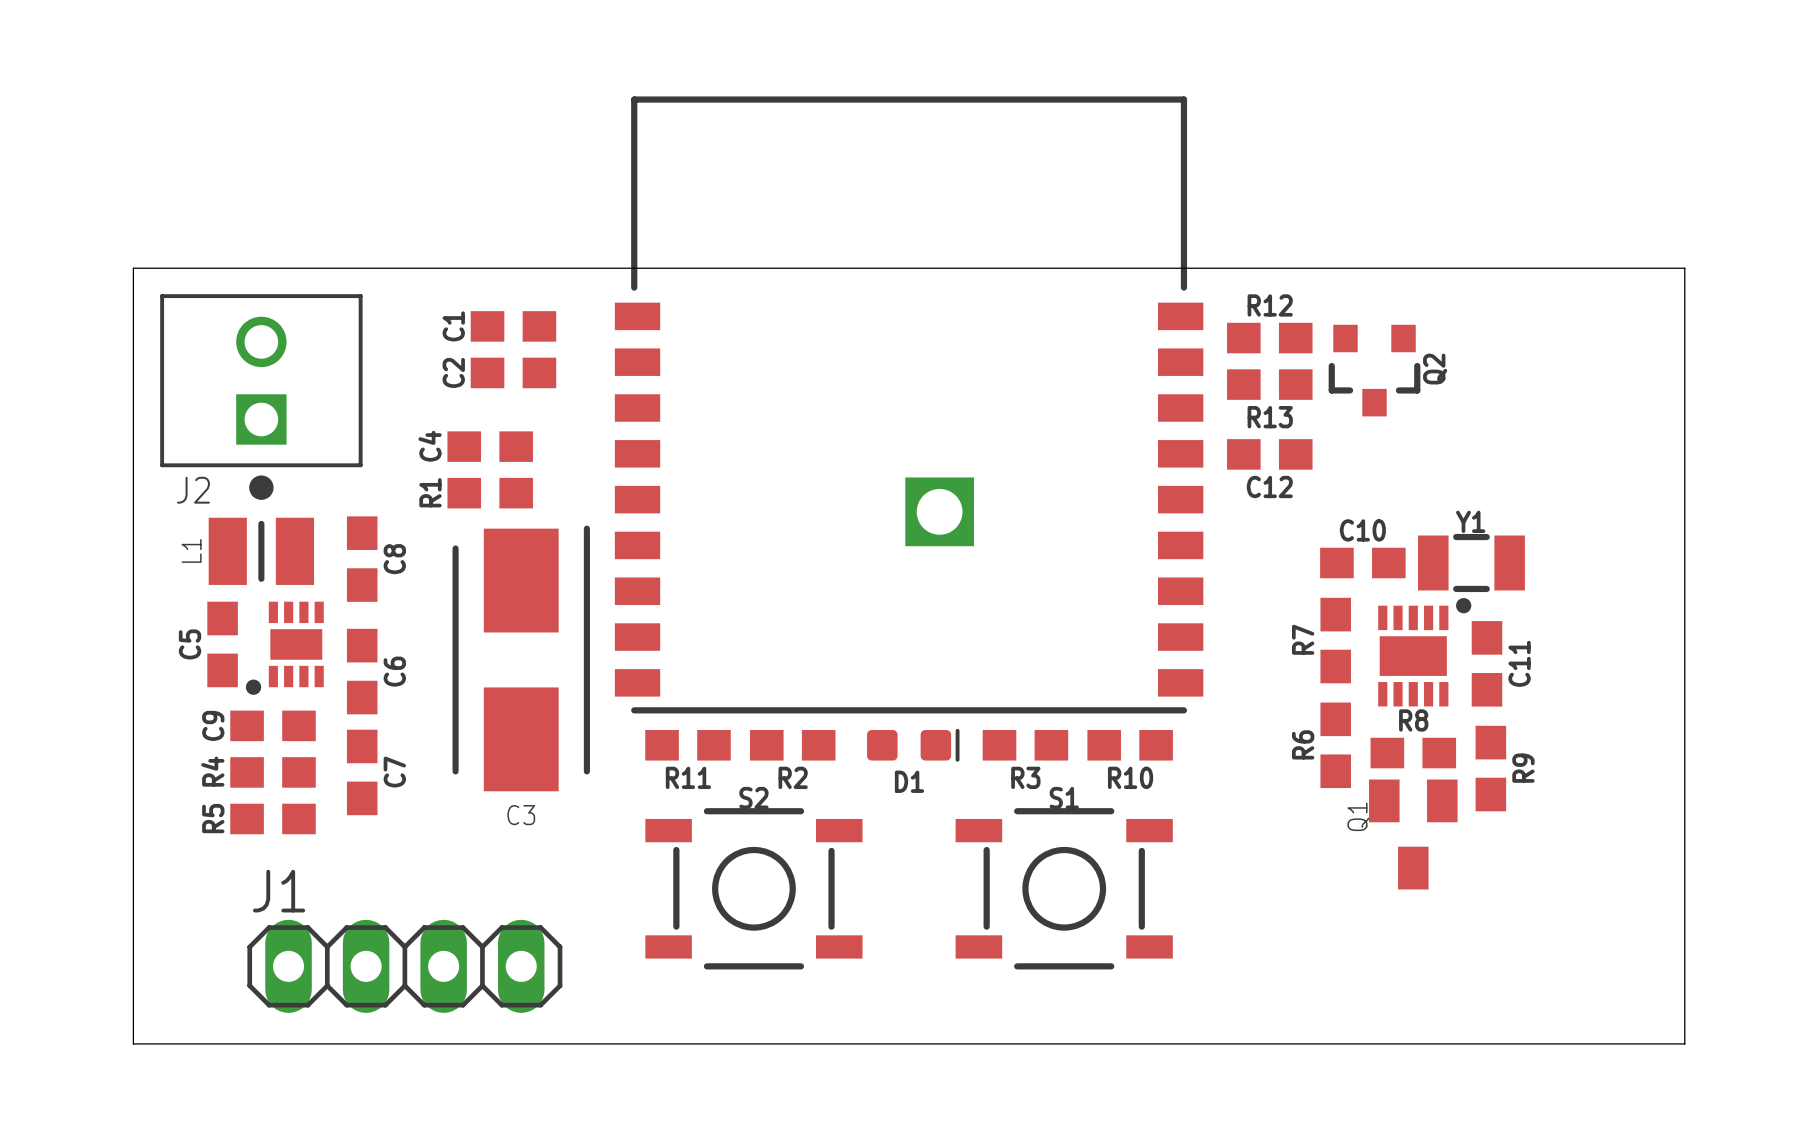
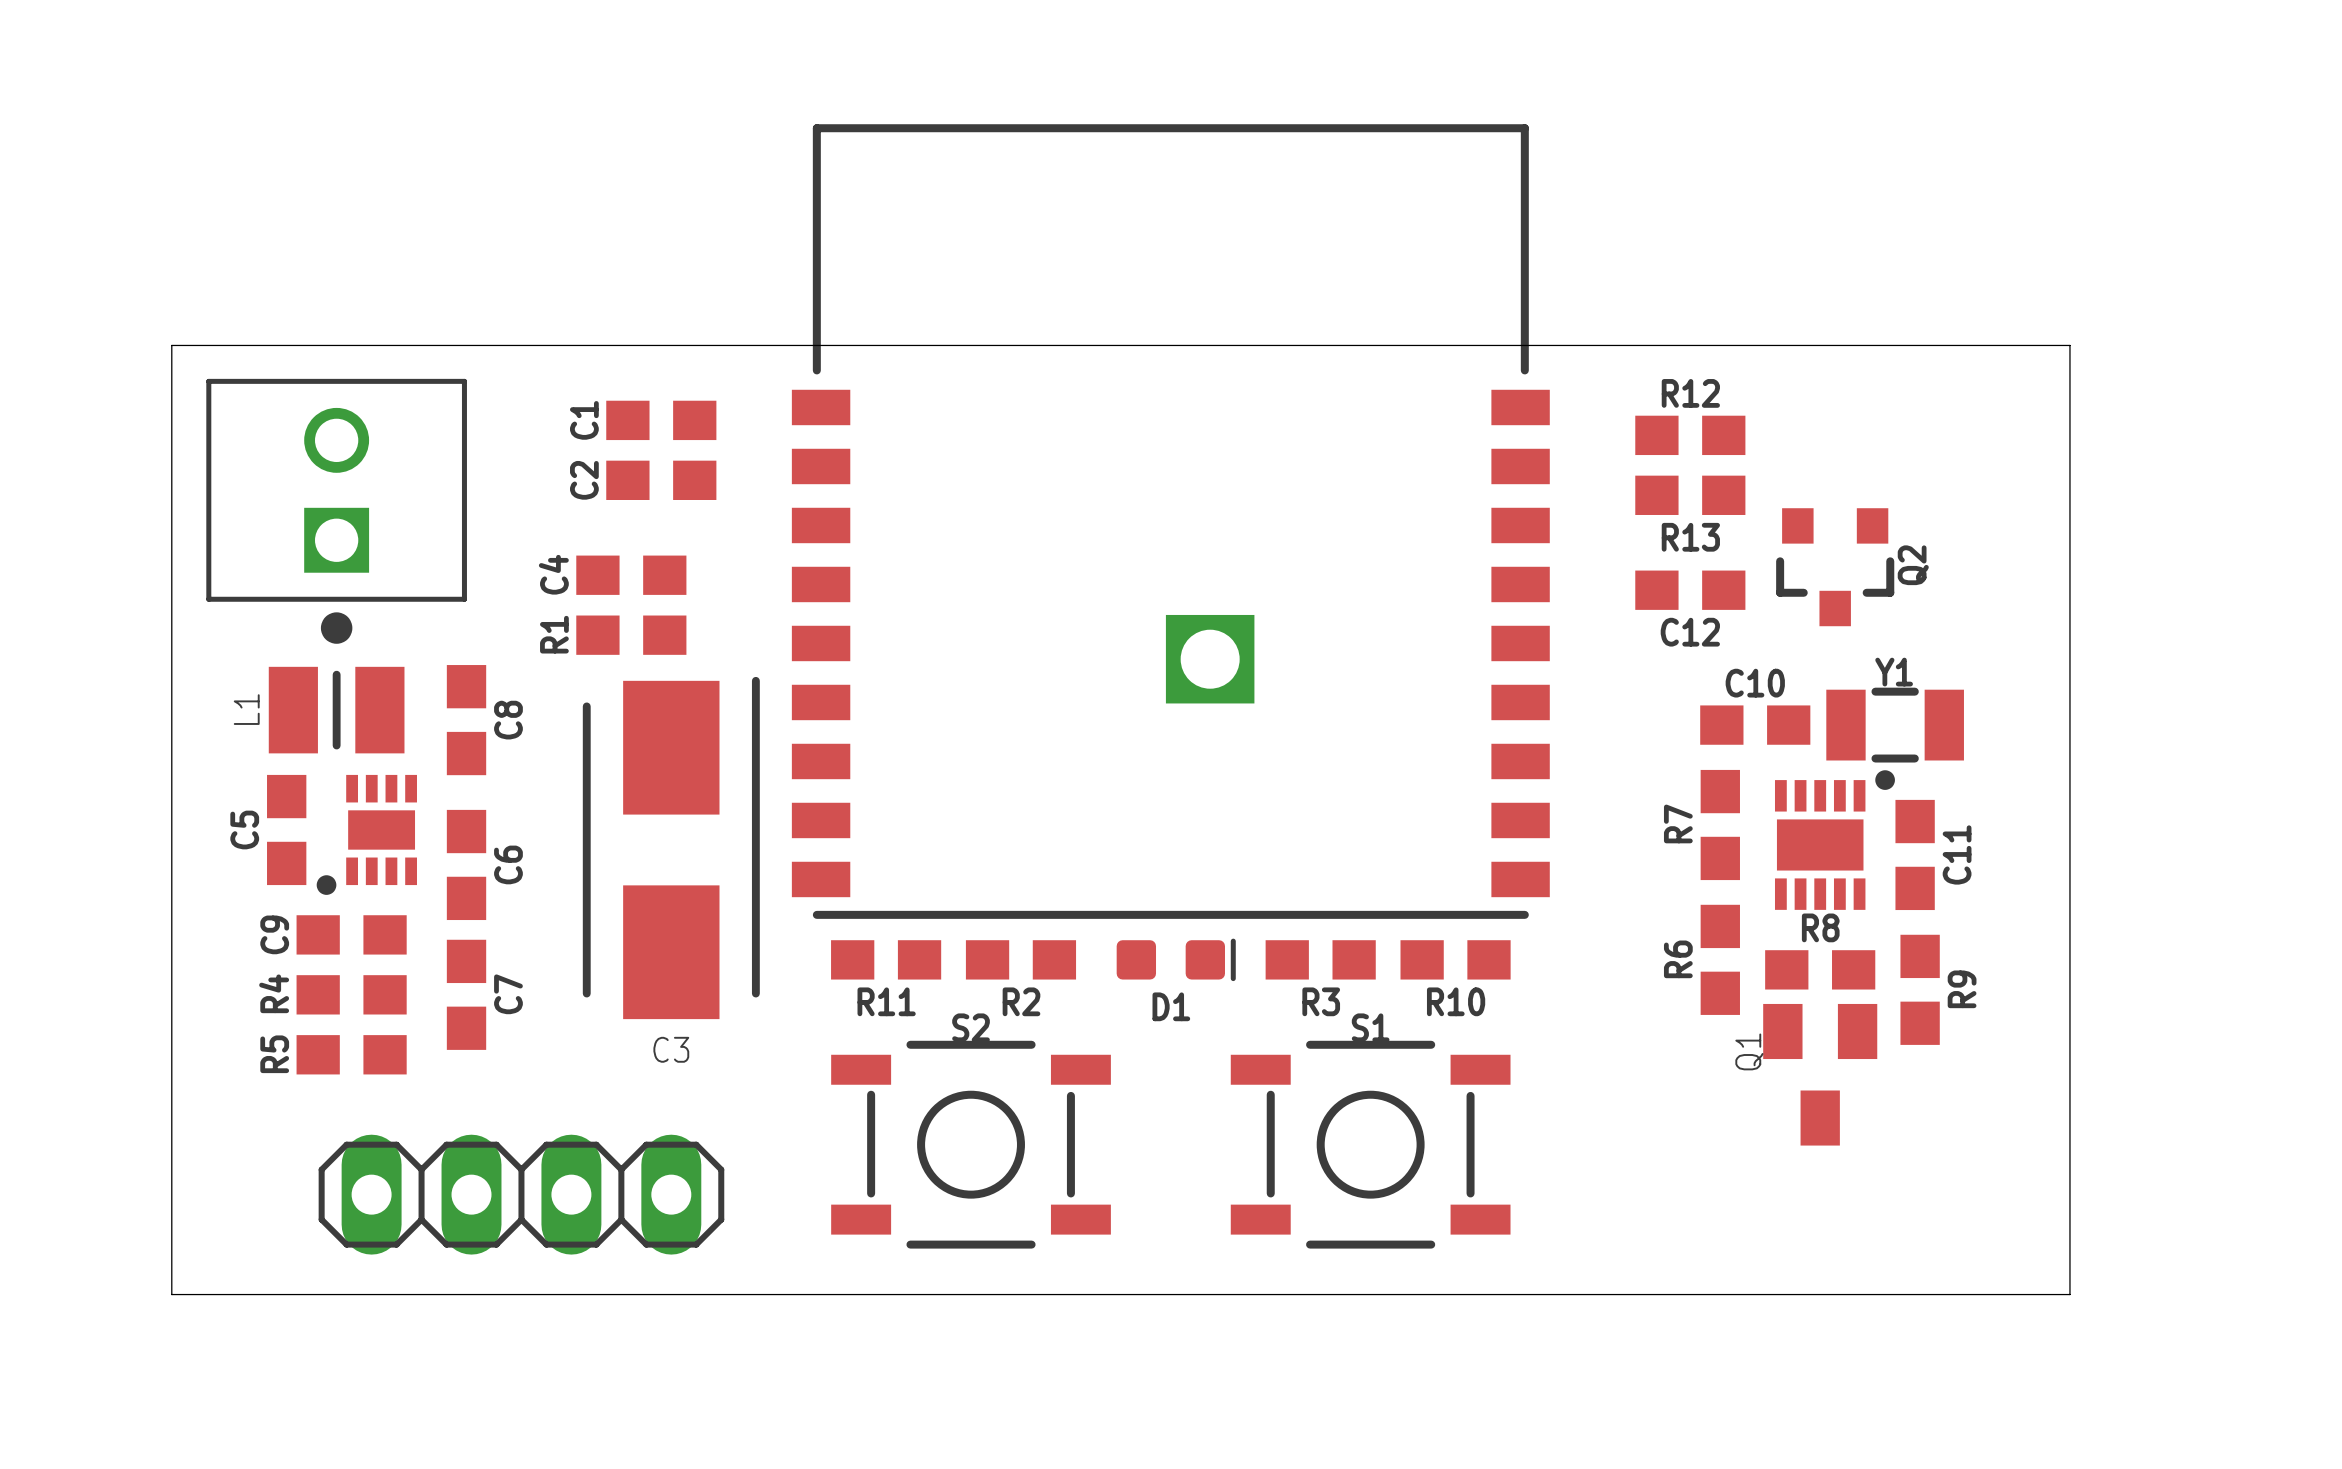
board edge: (1607, 268) (1684, 268) (1684, 1043) (133, 1043) (133, 1005) -> (2069, 345) (2069, 1294) (171, 1294)
R12 position: (1269, 338) -> (1690, 435)
Q2 position: (1374, 370) -> (1835, 567)
R13 position: (1269, 384) -> (1690, 495)
C12 position: (1269, 454) -> (1690, 590)
J2 name: J2 (193, 490) -> none
part: none -> (521, 1194)
J1: (404, 966) -> none

